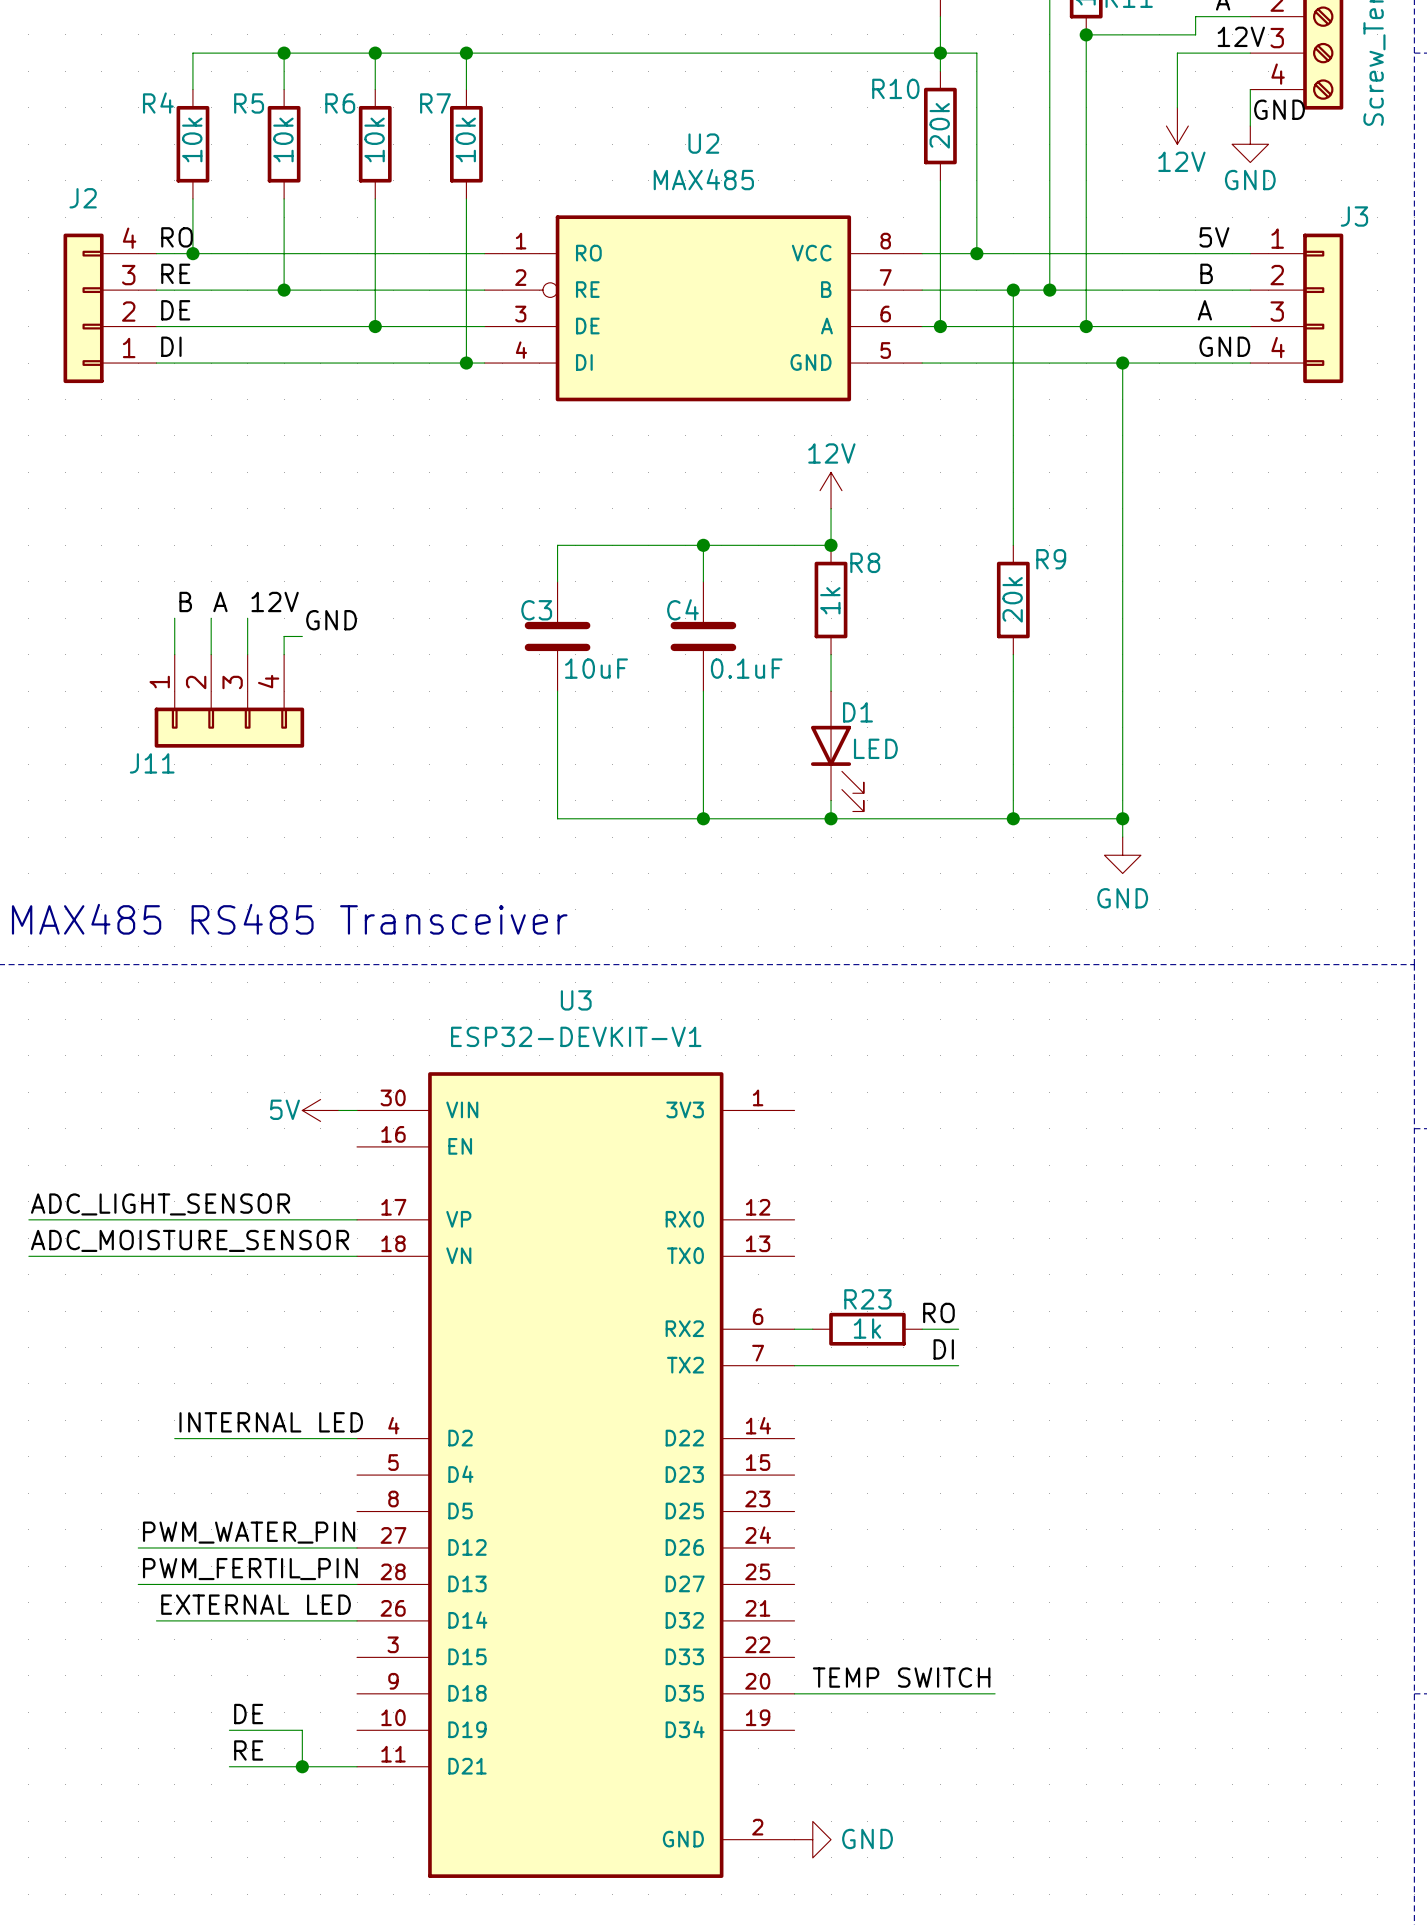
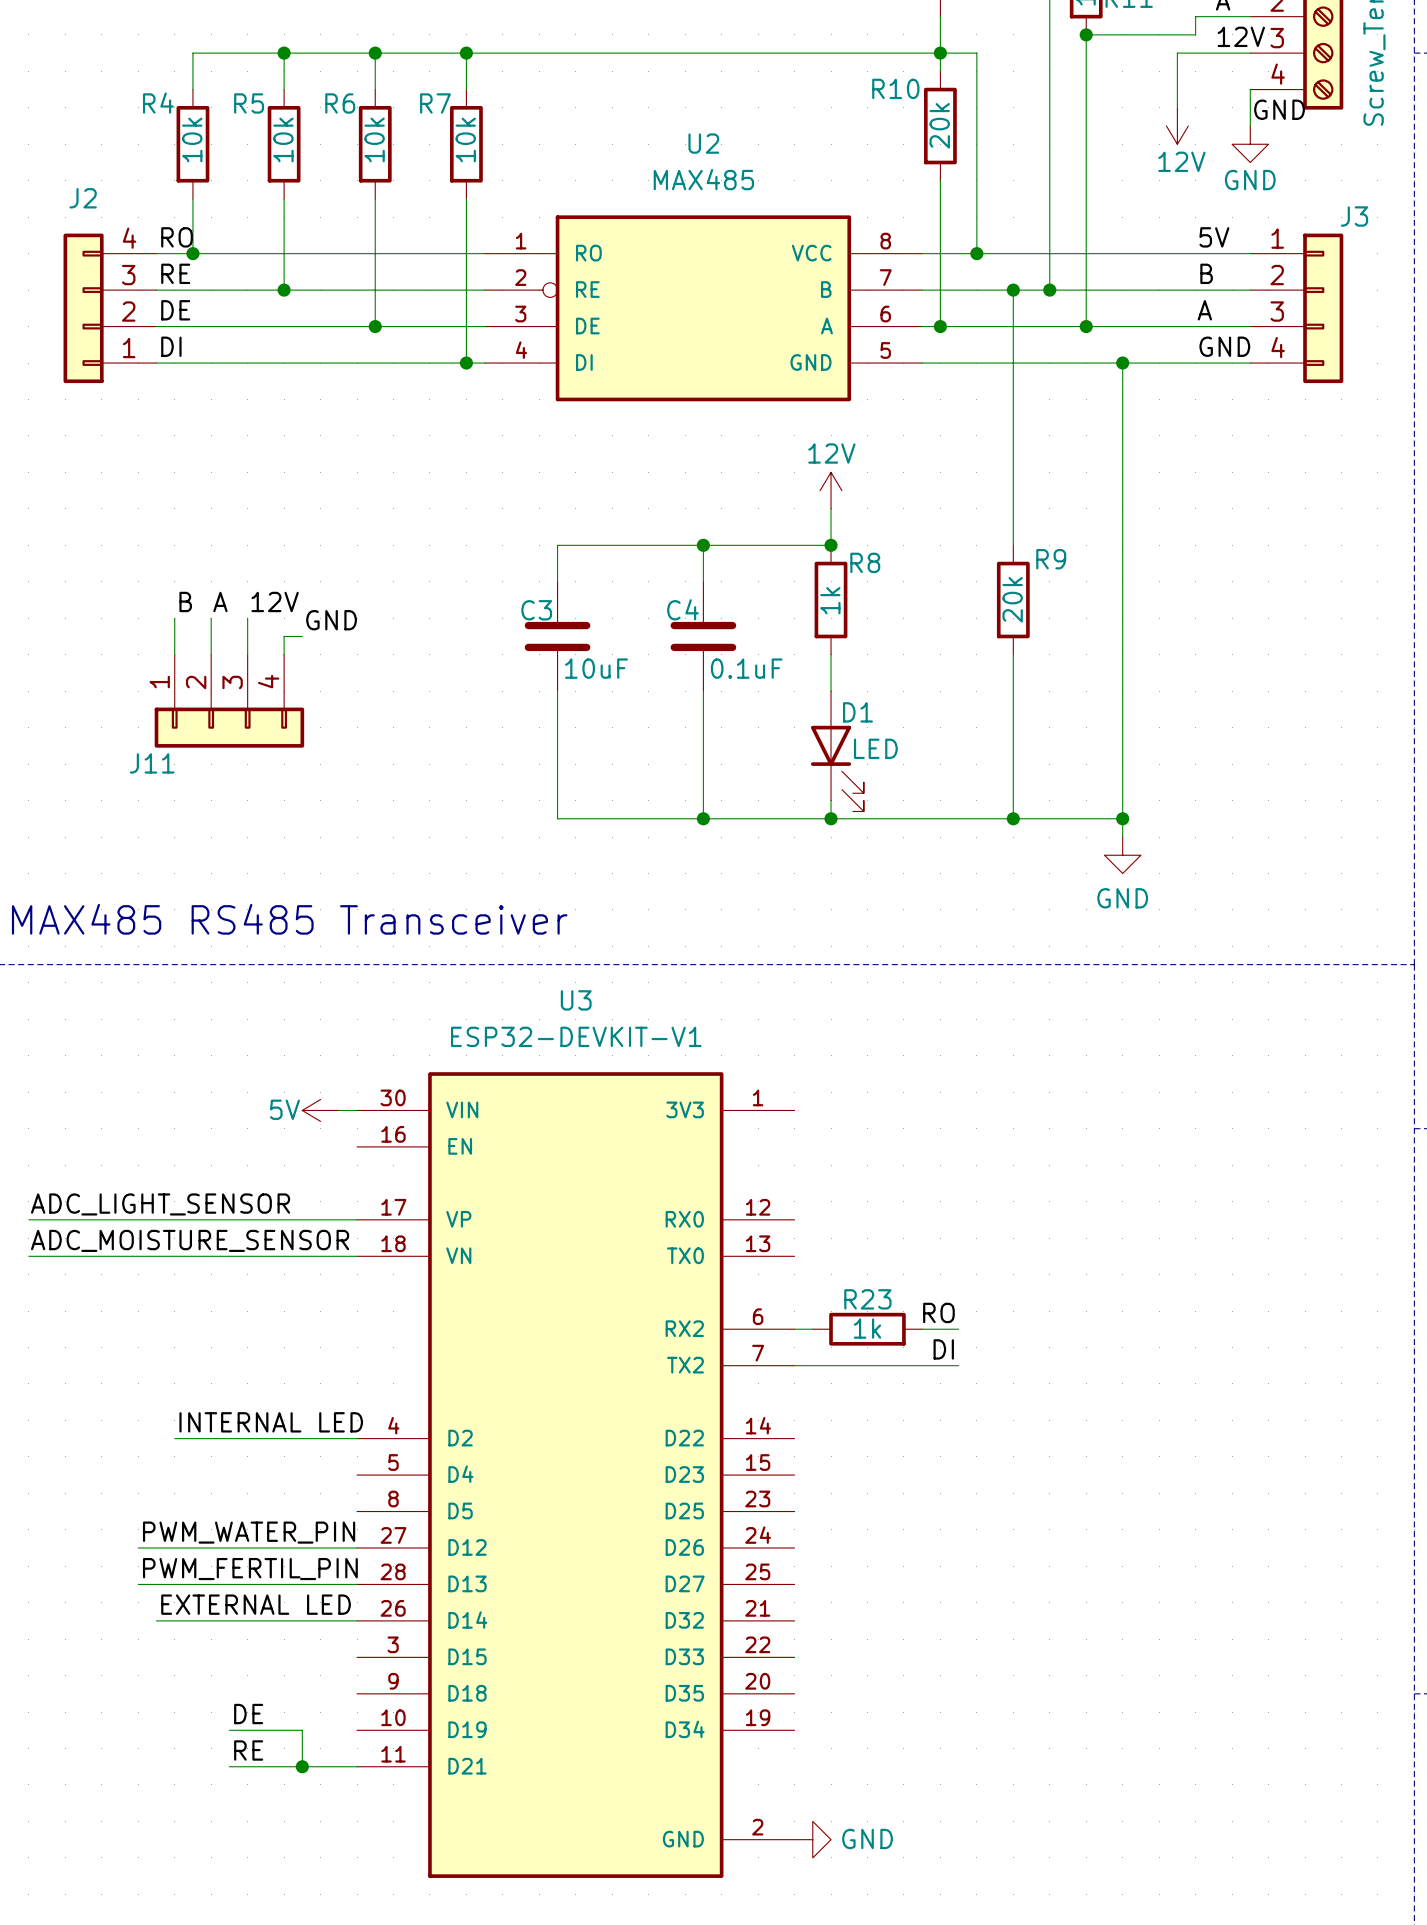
label: TEMP SWITCH (901, 1677) -> none
wire: (794, 1693) (995, 1693) -> none

